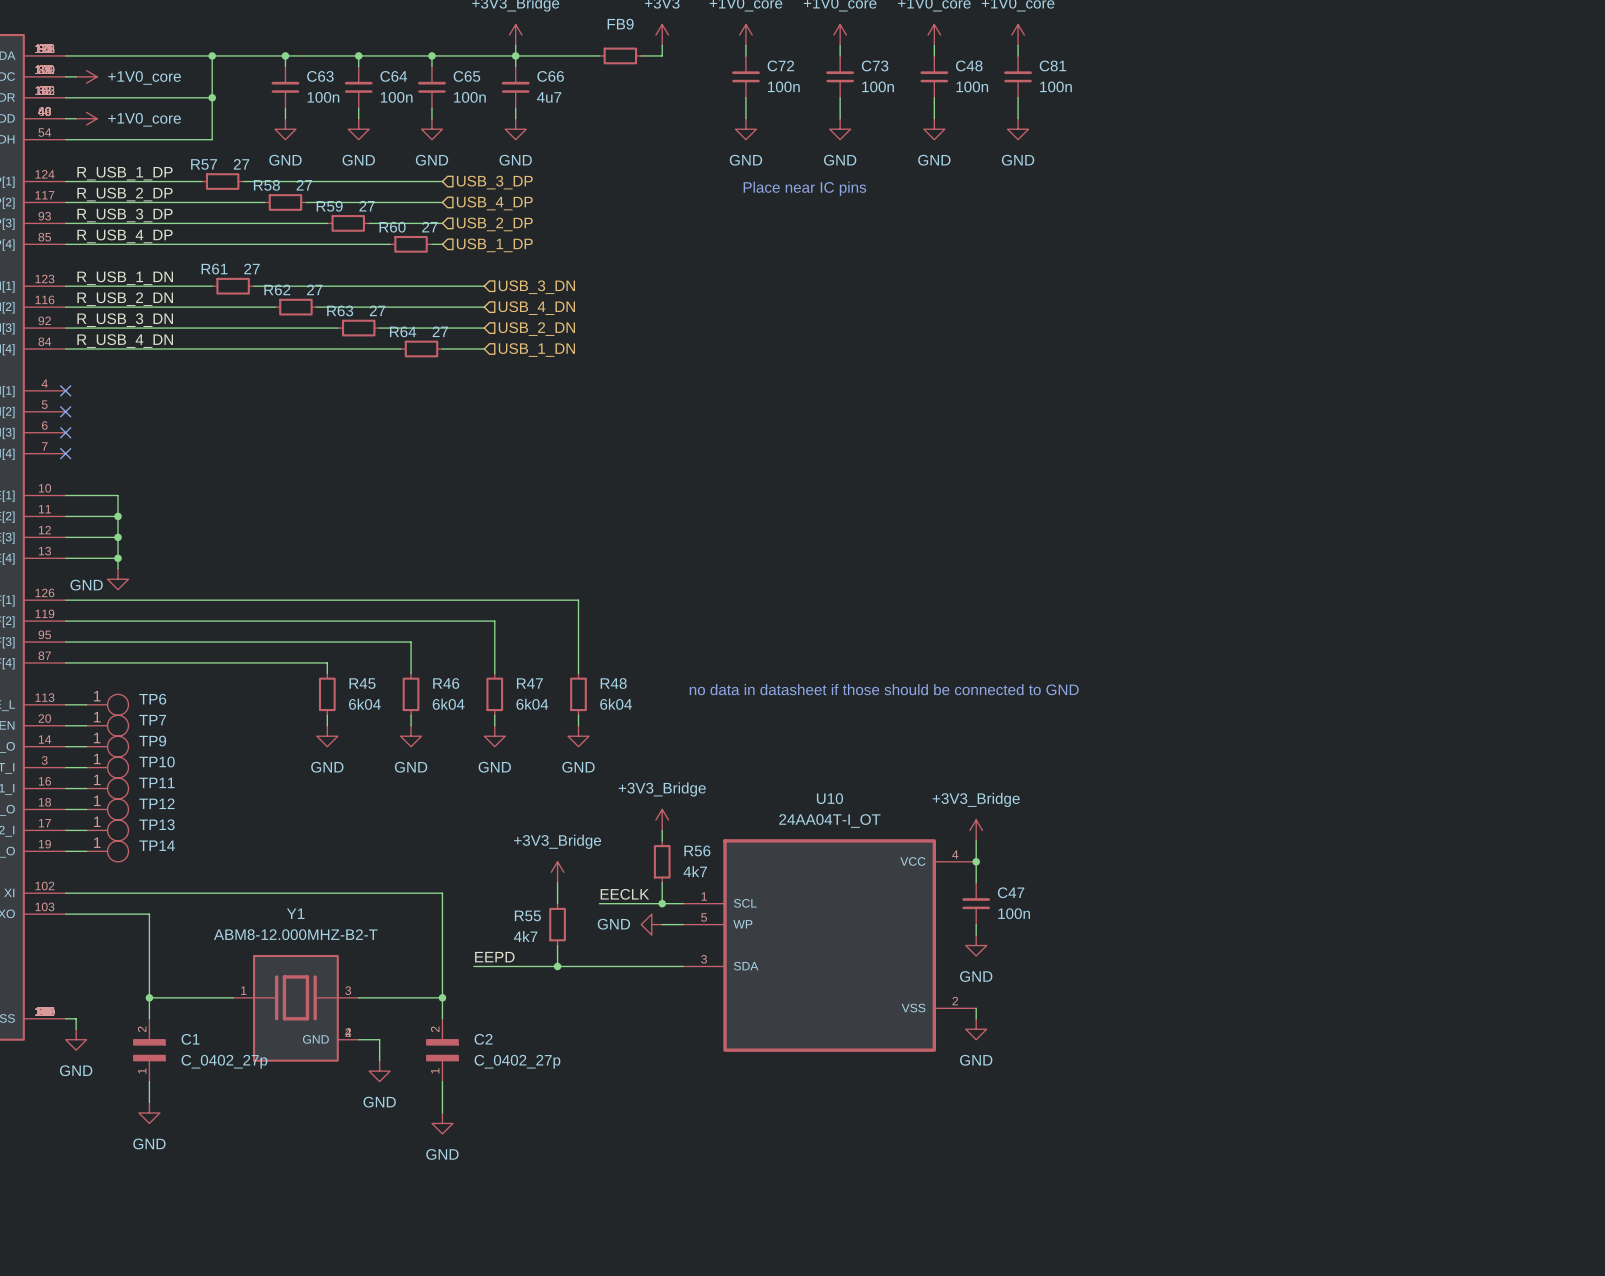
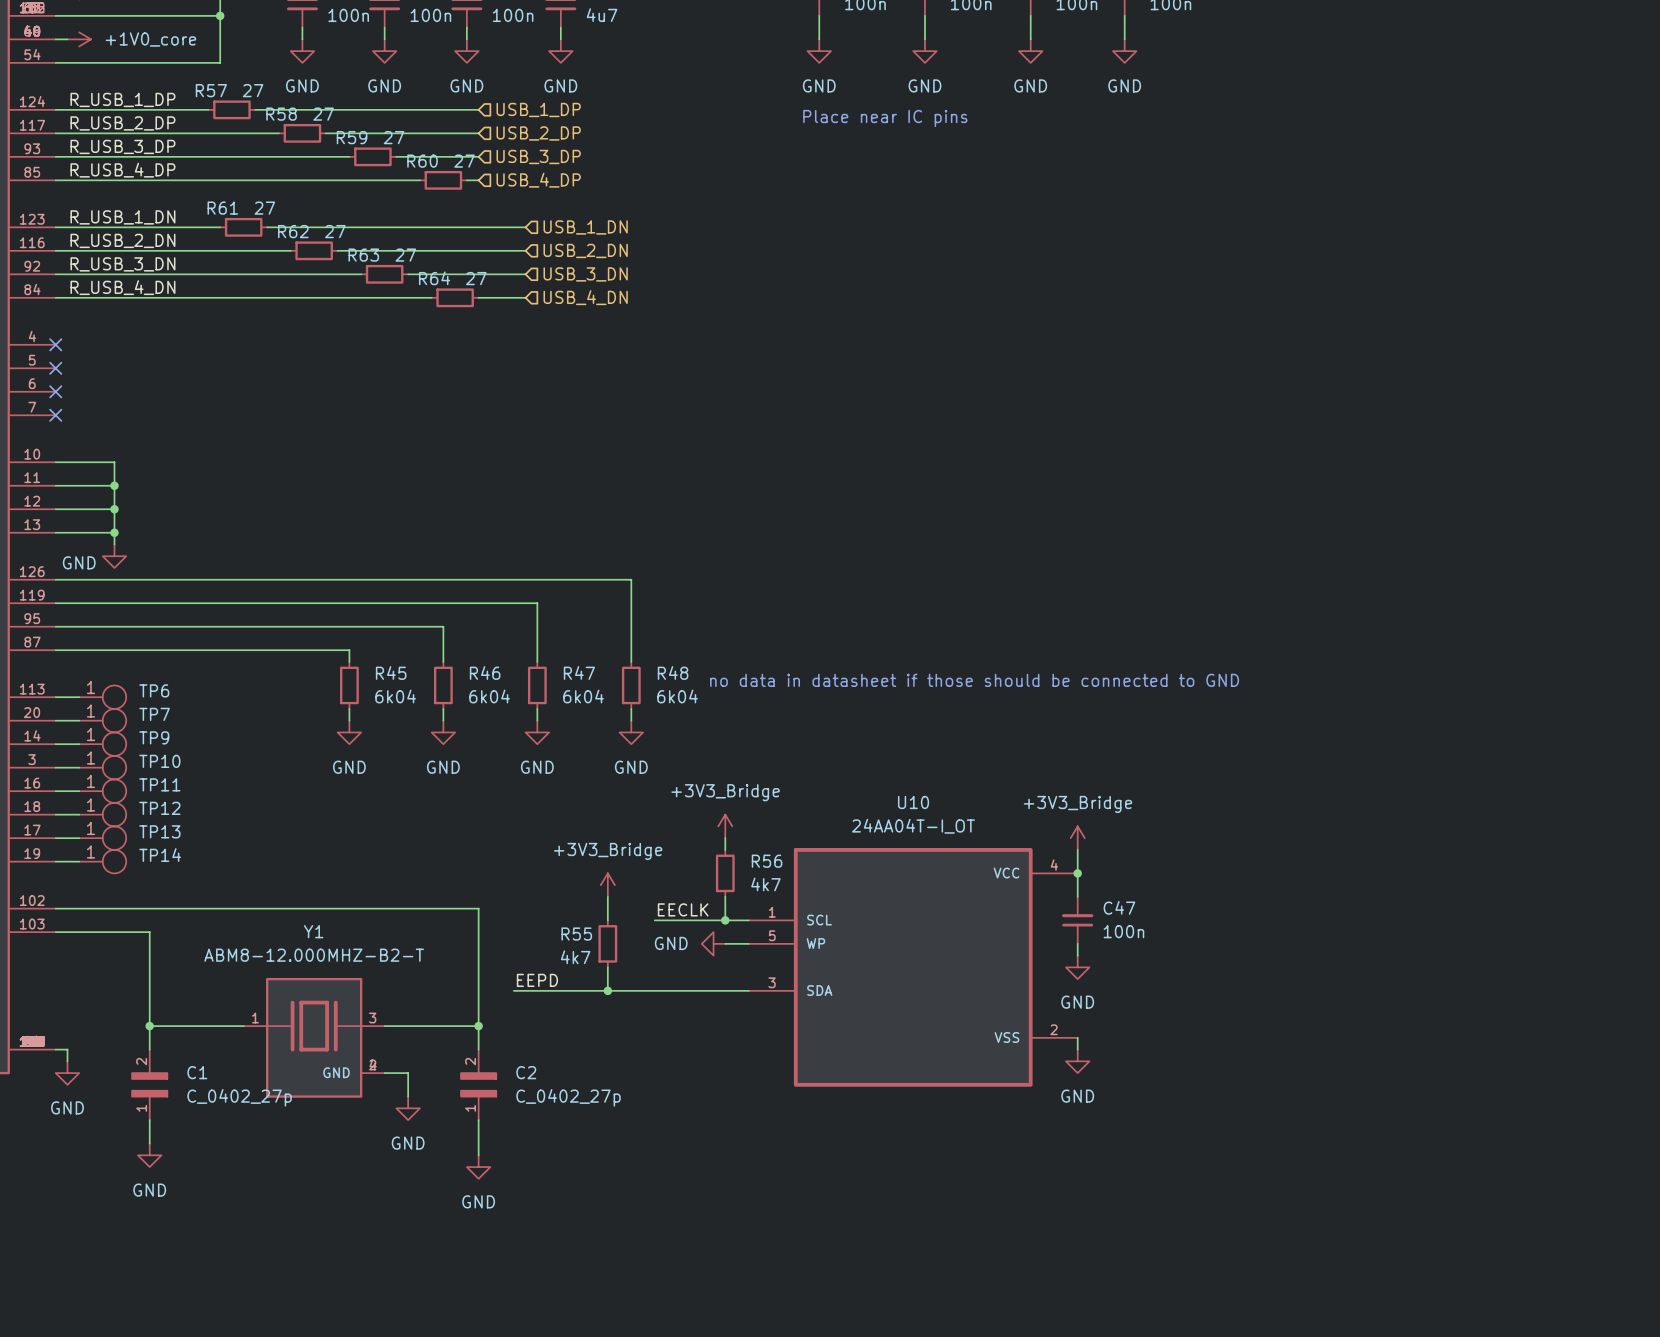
hierarchical label: USB_3_DP (494, 182) -> USB_1_DP (538, 109)
hierarchical label: USB_4_DP (494, 203) -> USB_2_DP (538, 133)
hierarchical label: USB_2_DP (494, 224) -> USB_3_DP (538, 156)
hierarchical label: USB_1_DP (494, 245) -> USB_4_DP (538, 180)
hierarchical label: USB_3_DN (536, 287) -> USB_1_DN (585, 227)
hierarchical label: USB_4_DN (536, 308) -> USB_2_DN (585, 250)
hierarchical label: USB_2_DN (536, 329) -> USB_3_DN (585, 274)
hierarchical label: USB_1_DN (536, 350) -> USB_4_DN (585, 297)

